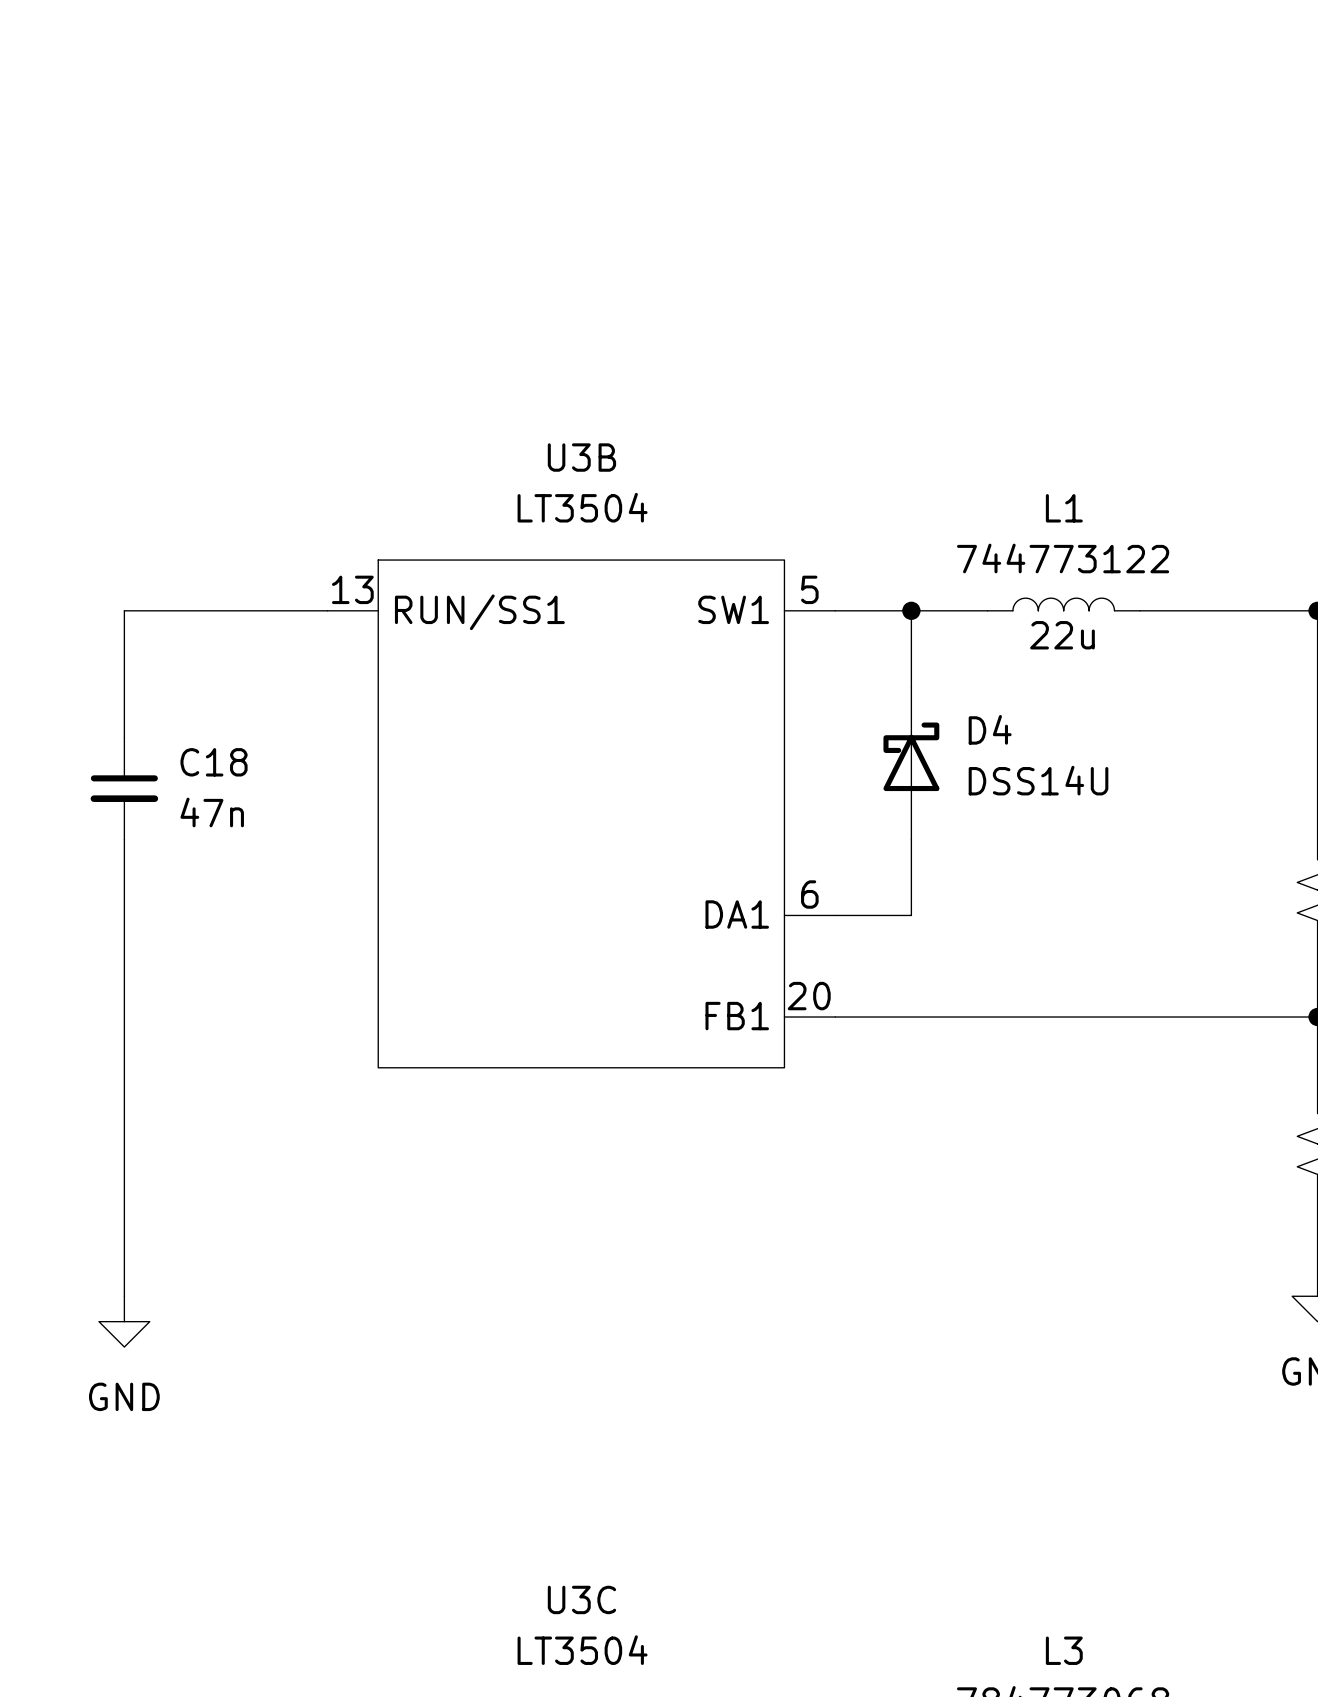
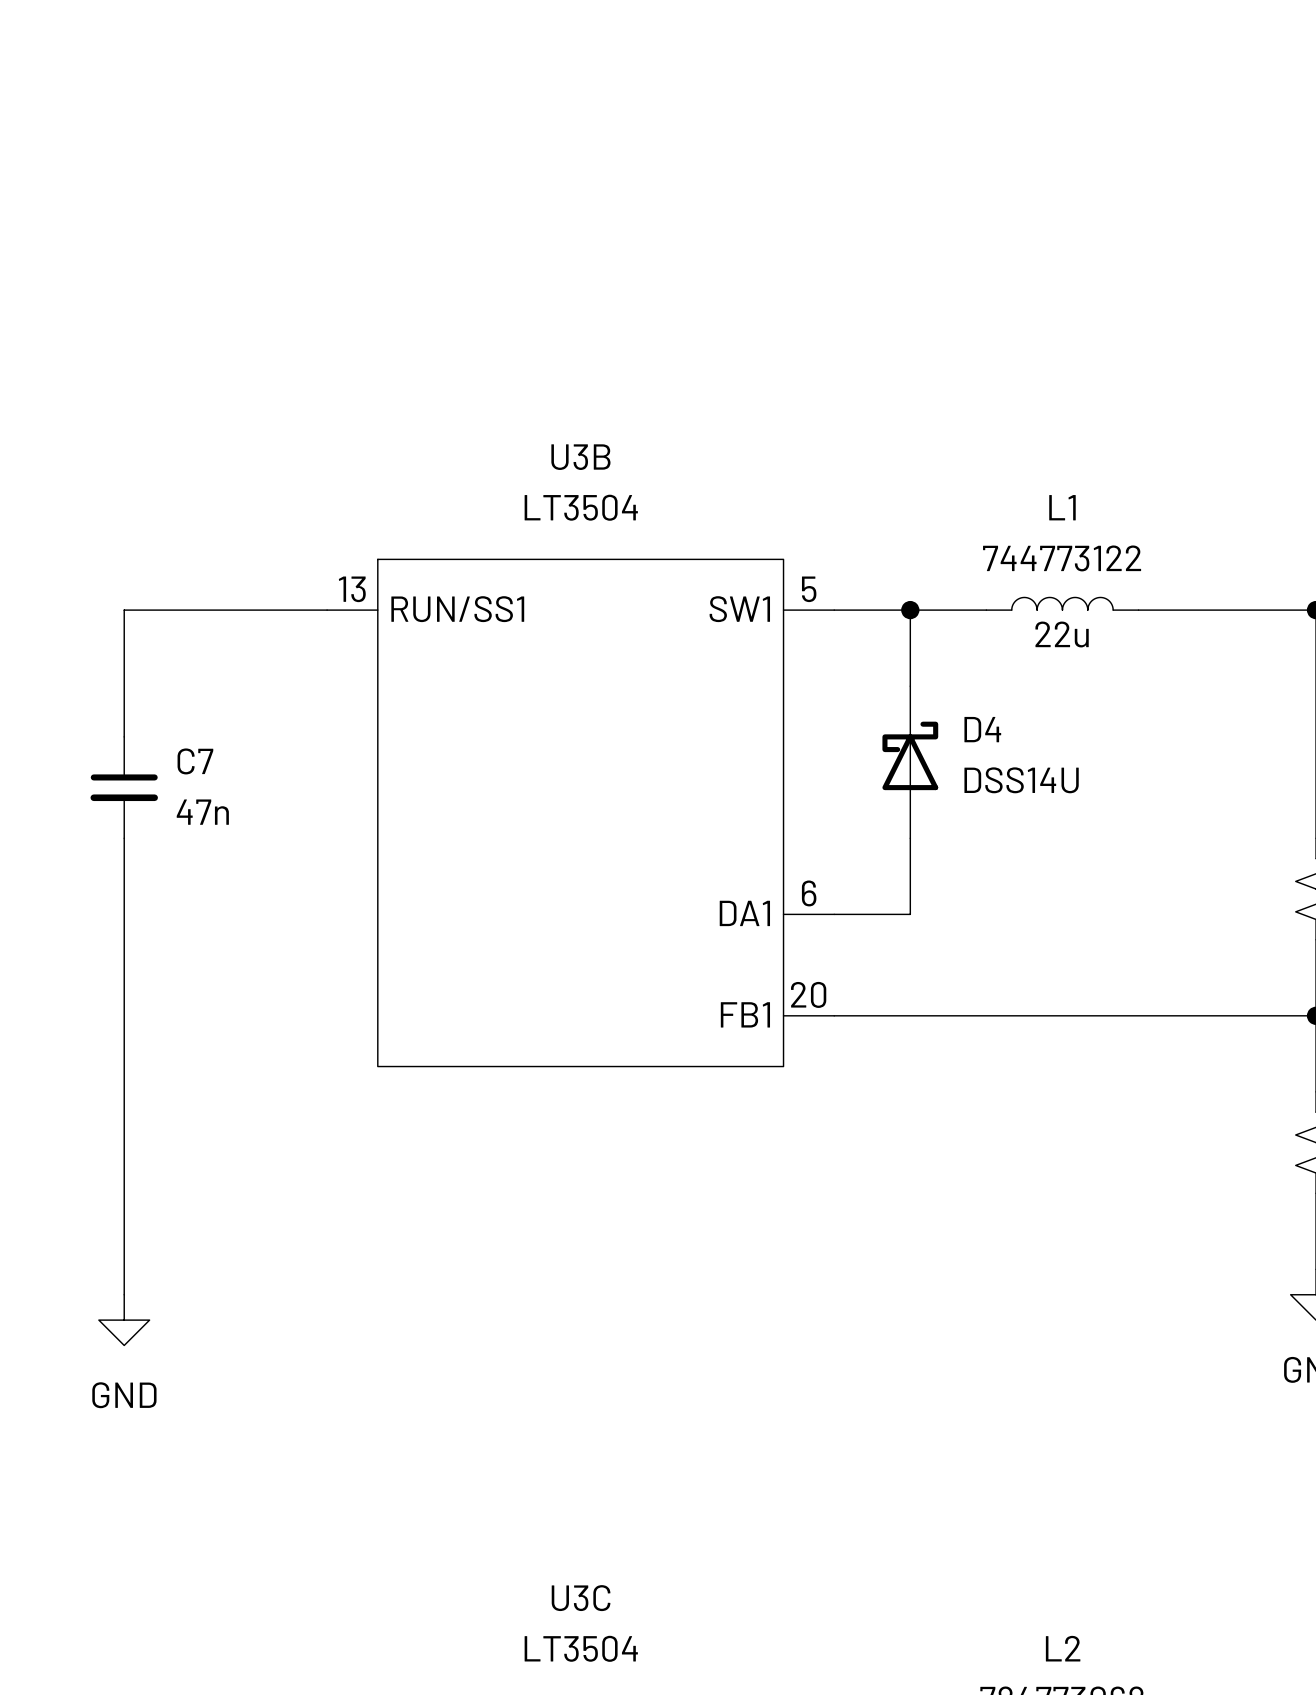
C18 name: C18 (214, 762) -> C7 (195, 761)
L3 name: L3 (1064, 1650) -> L2 (1063, 1648)

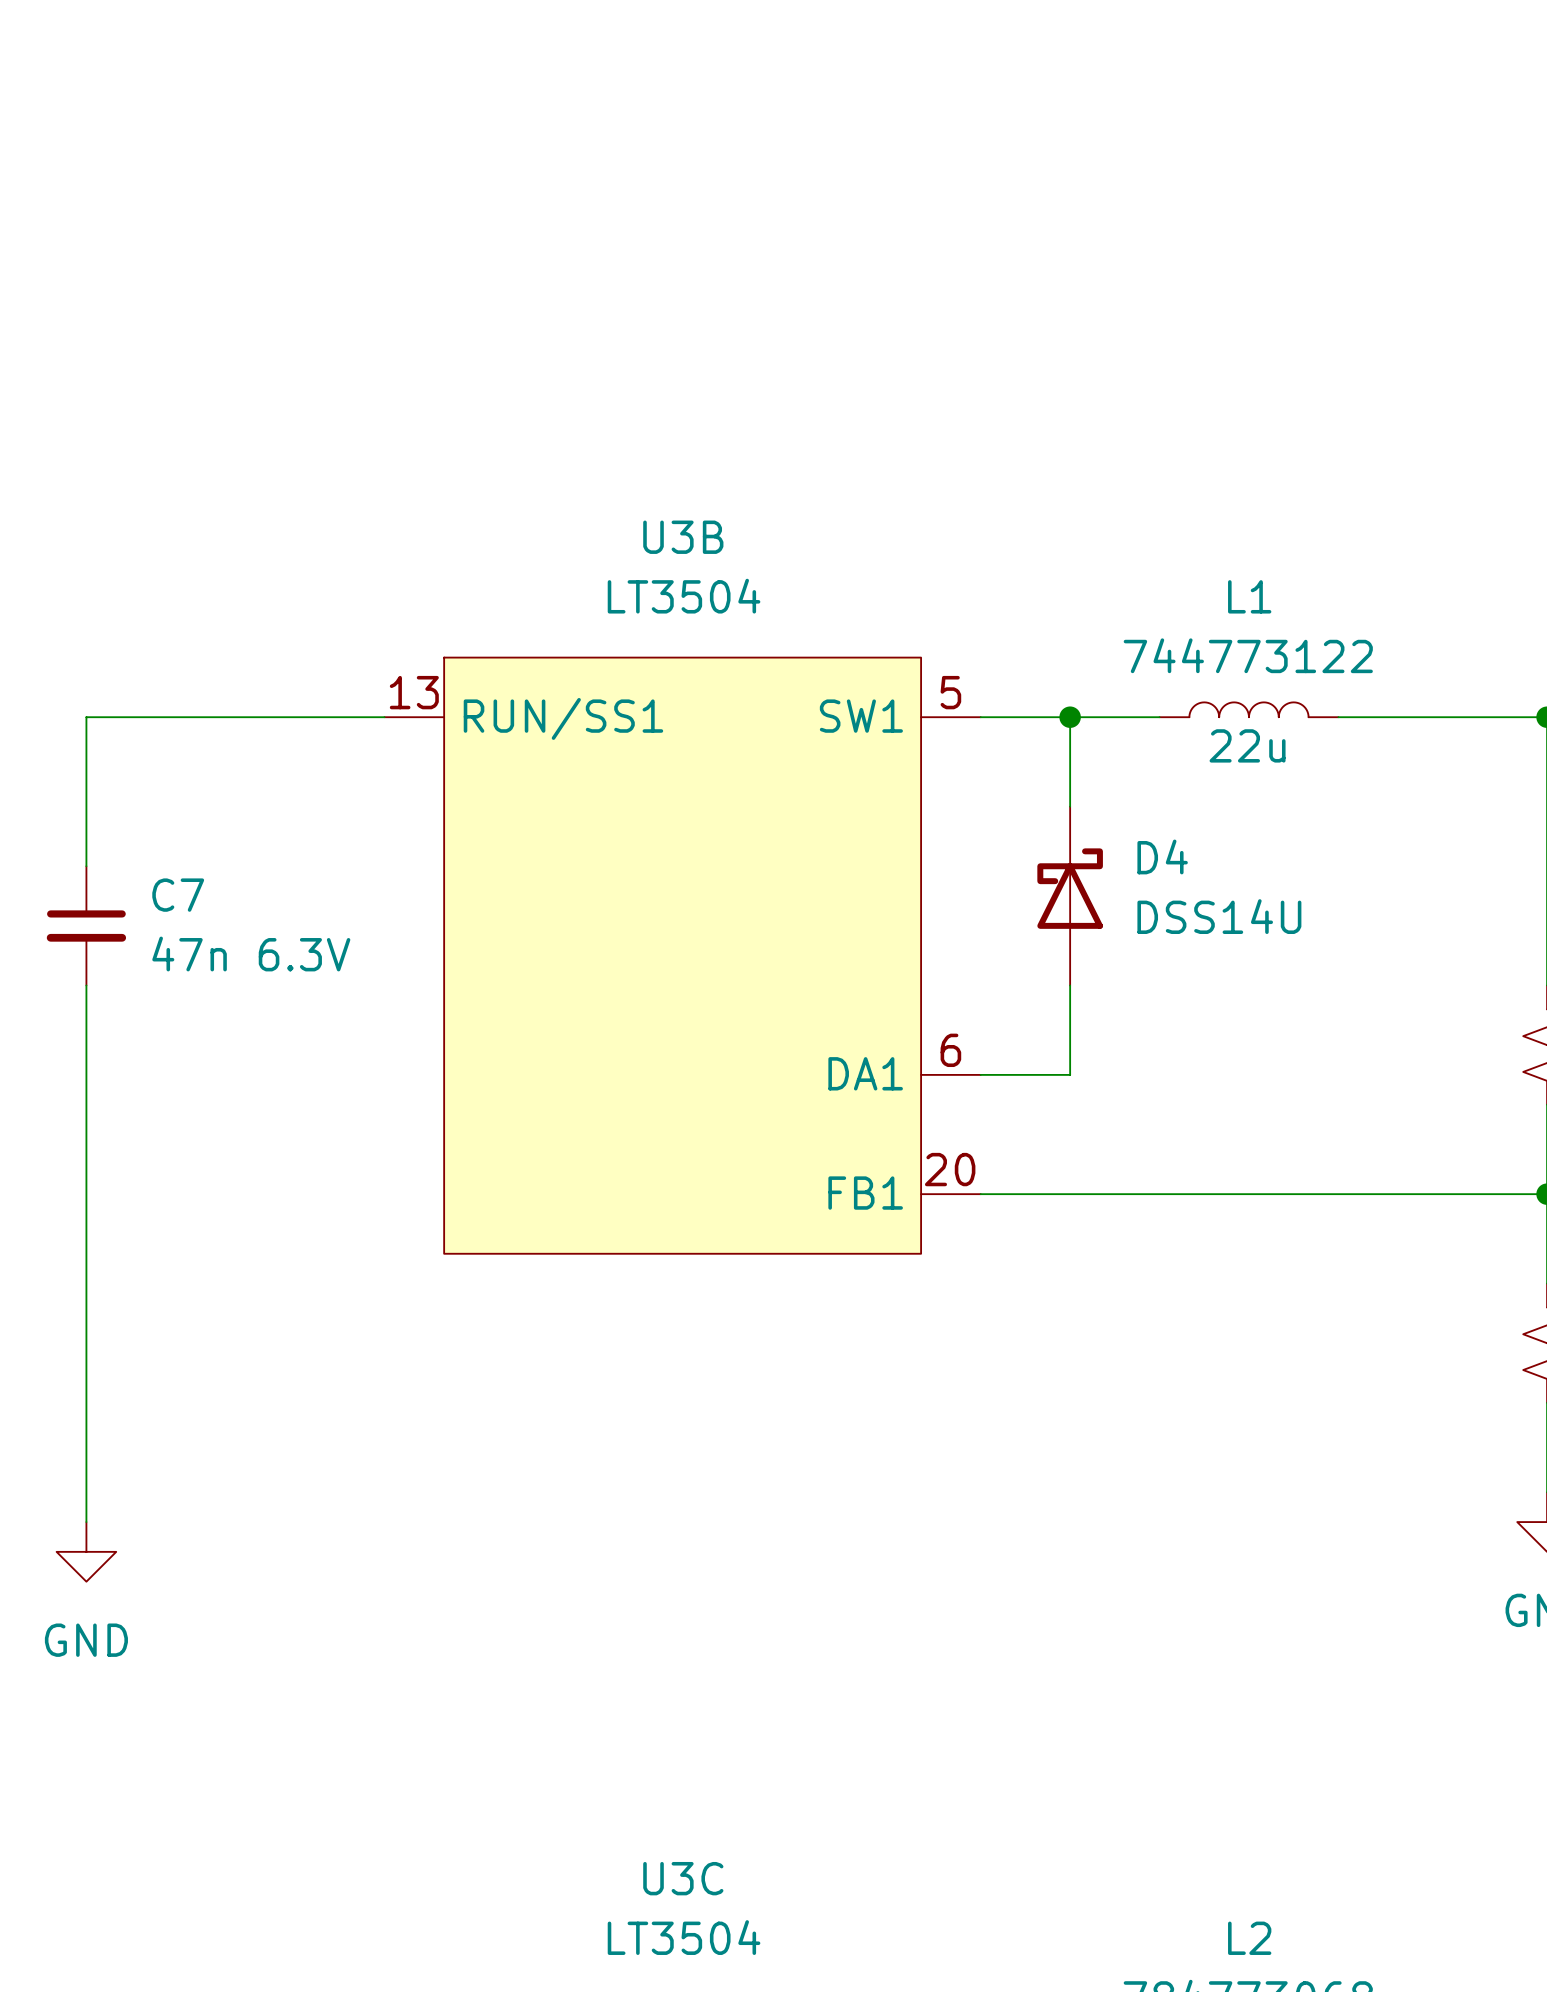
wire: (124, 610) (124, 736) -> (146, 717) (86, 717) (86, 866)
C7 position: (124, 787) -> (86, 925)
C7 value: 47n (202, 812) -> 47n 6.3V (251, 954)
wire: (124, 838) (124, 1294) -> (86, 985) (86, 1522)
power symbol position: GND (124, 1320) -> GND (86, 1551)

